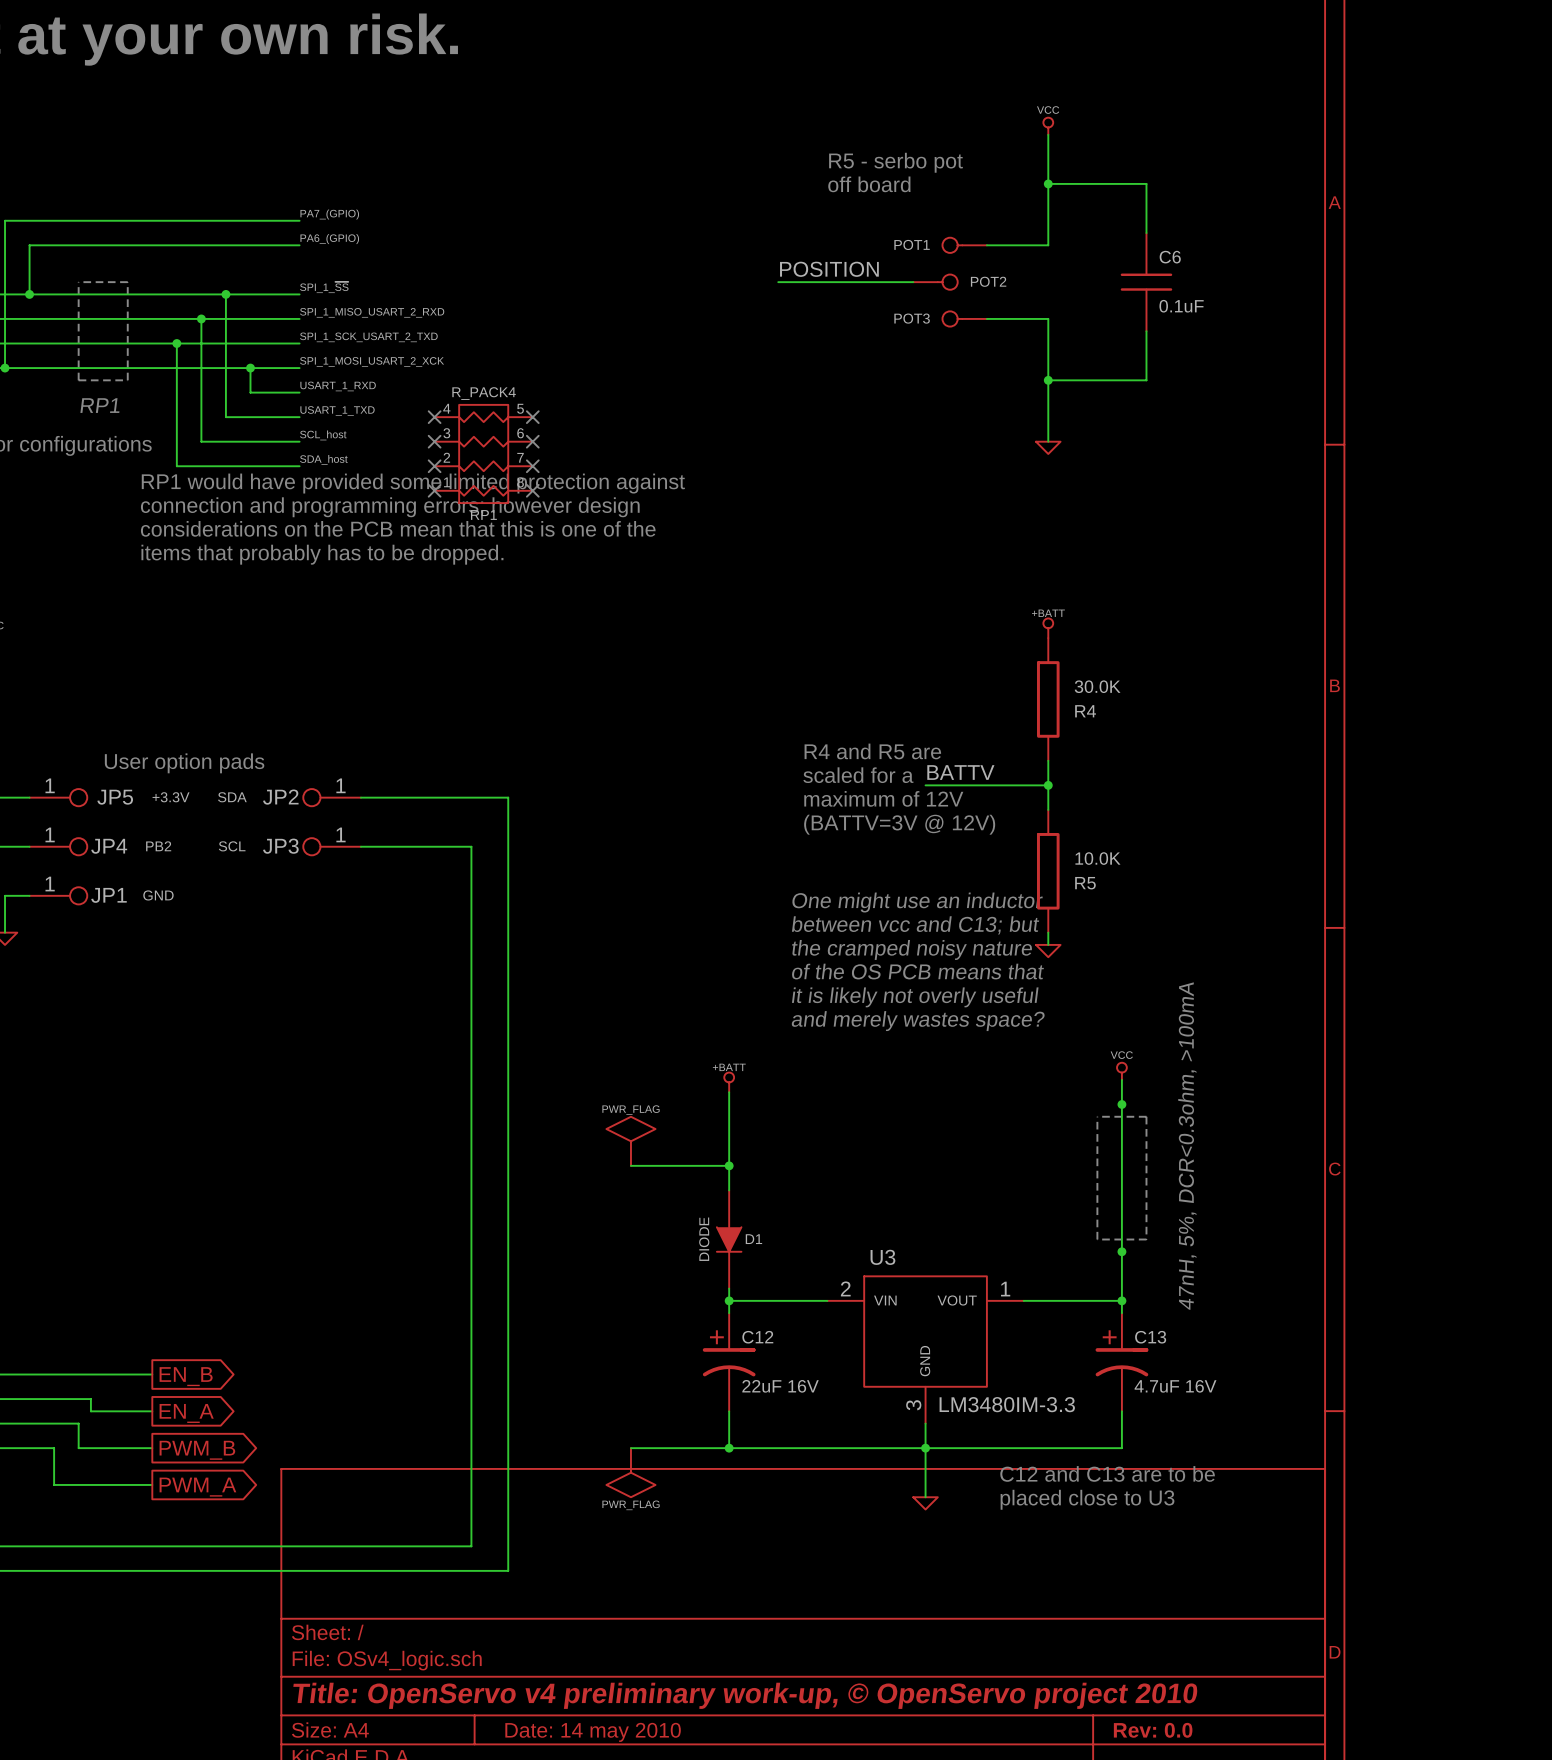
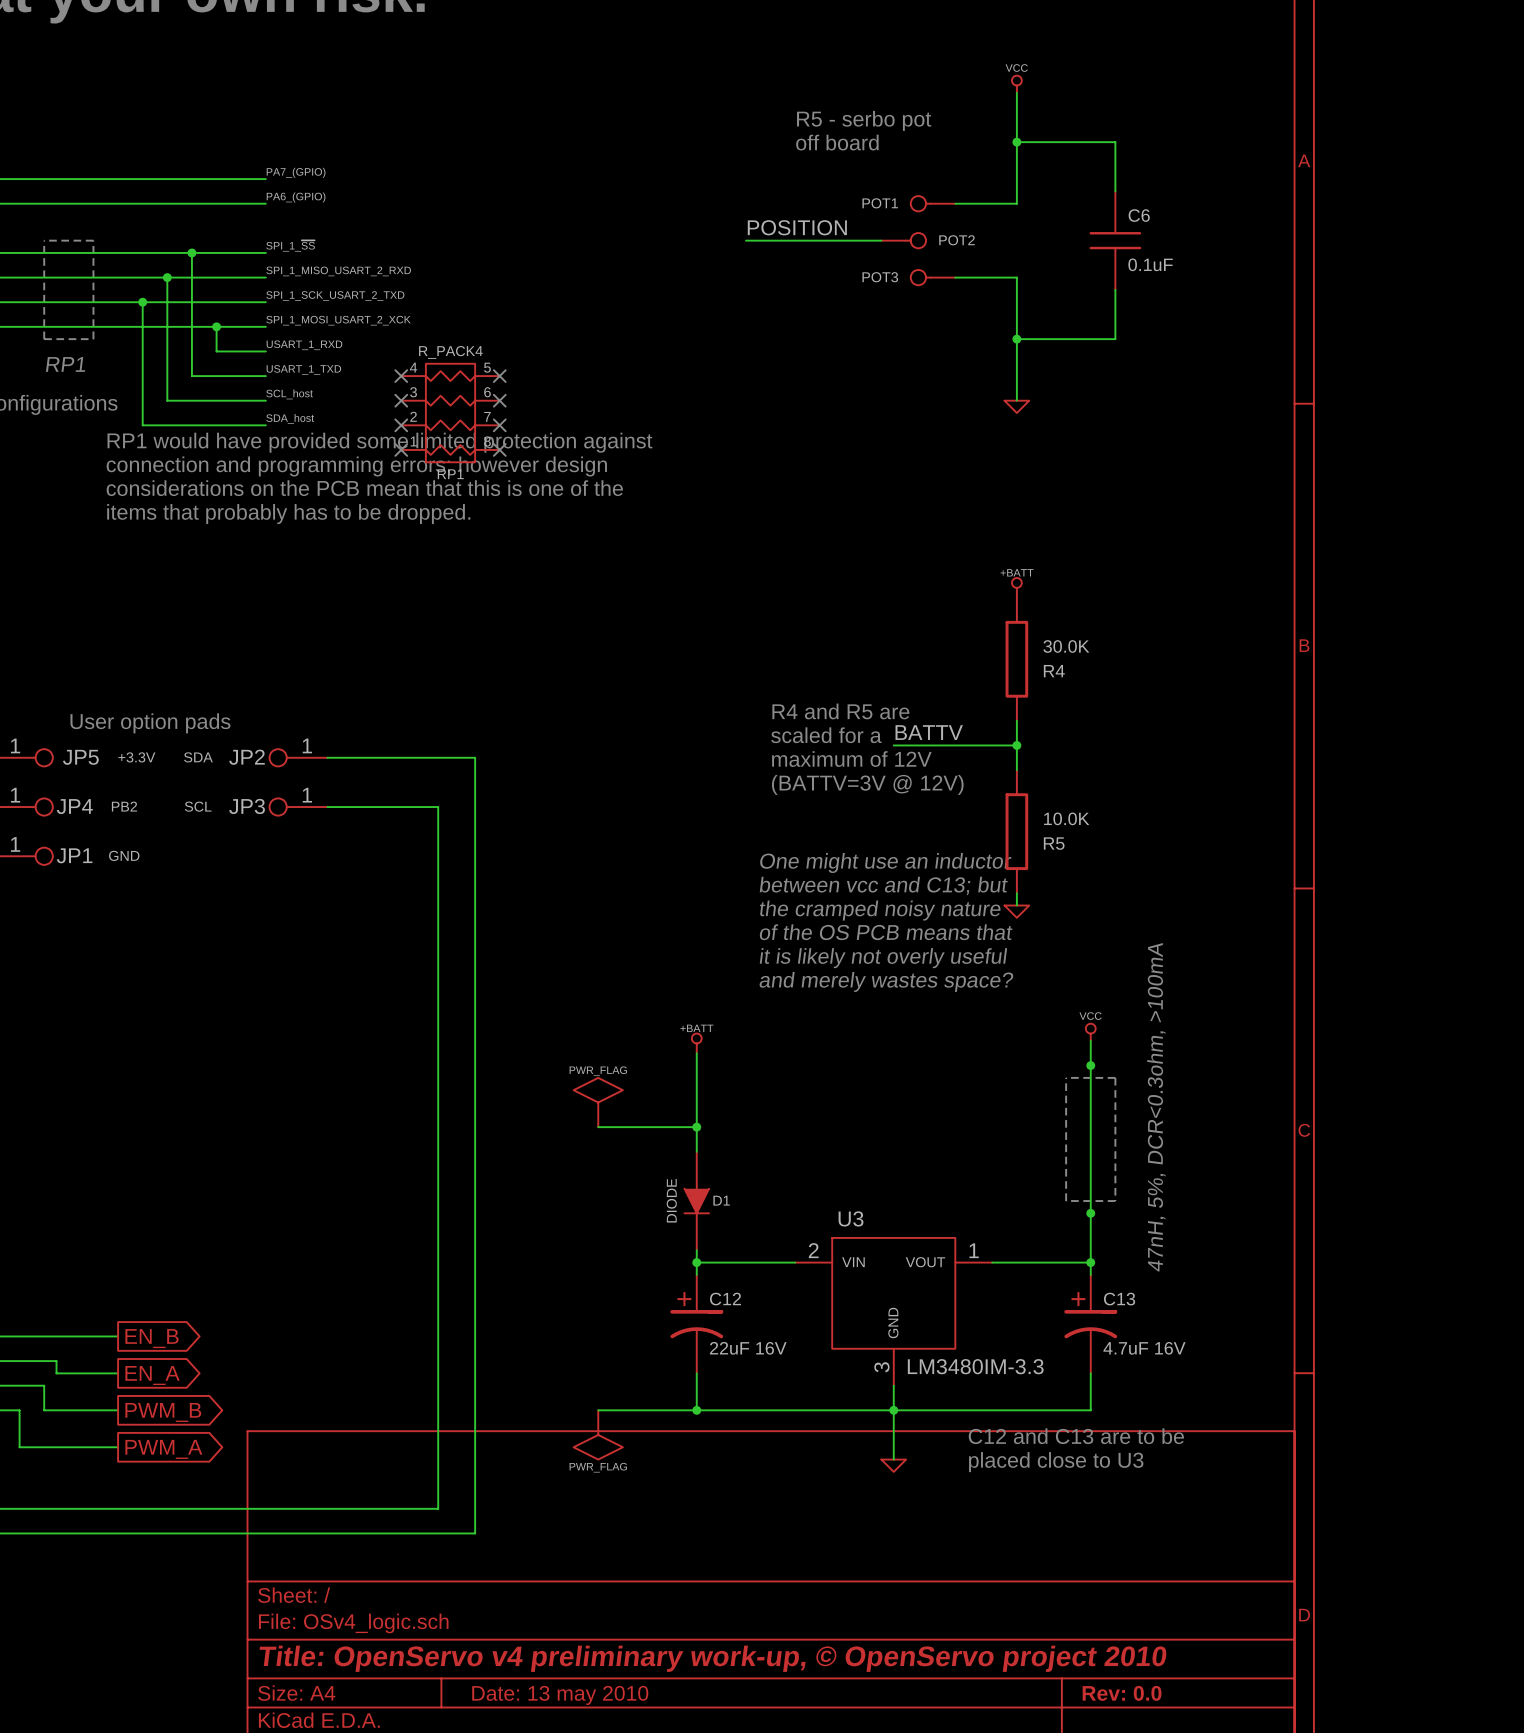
title block: Date: 14 may 2010 (593, 1732) -> Date: 13 may 2010 (560, 1695)

